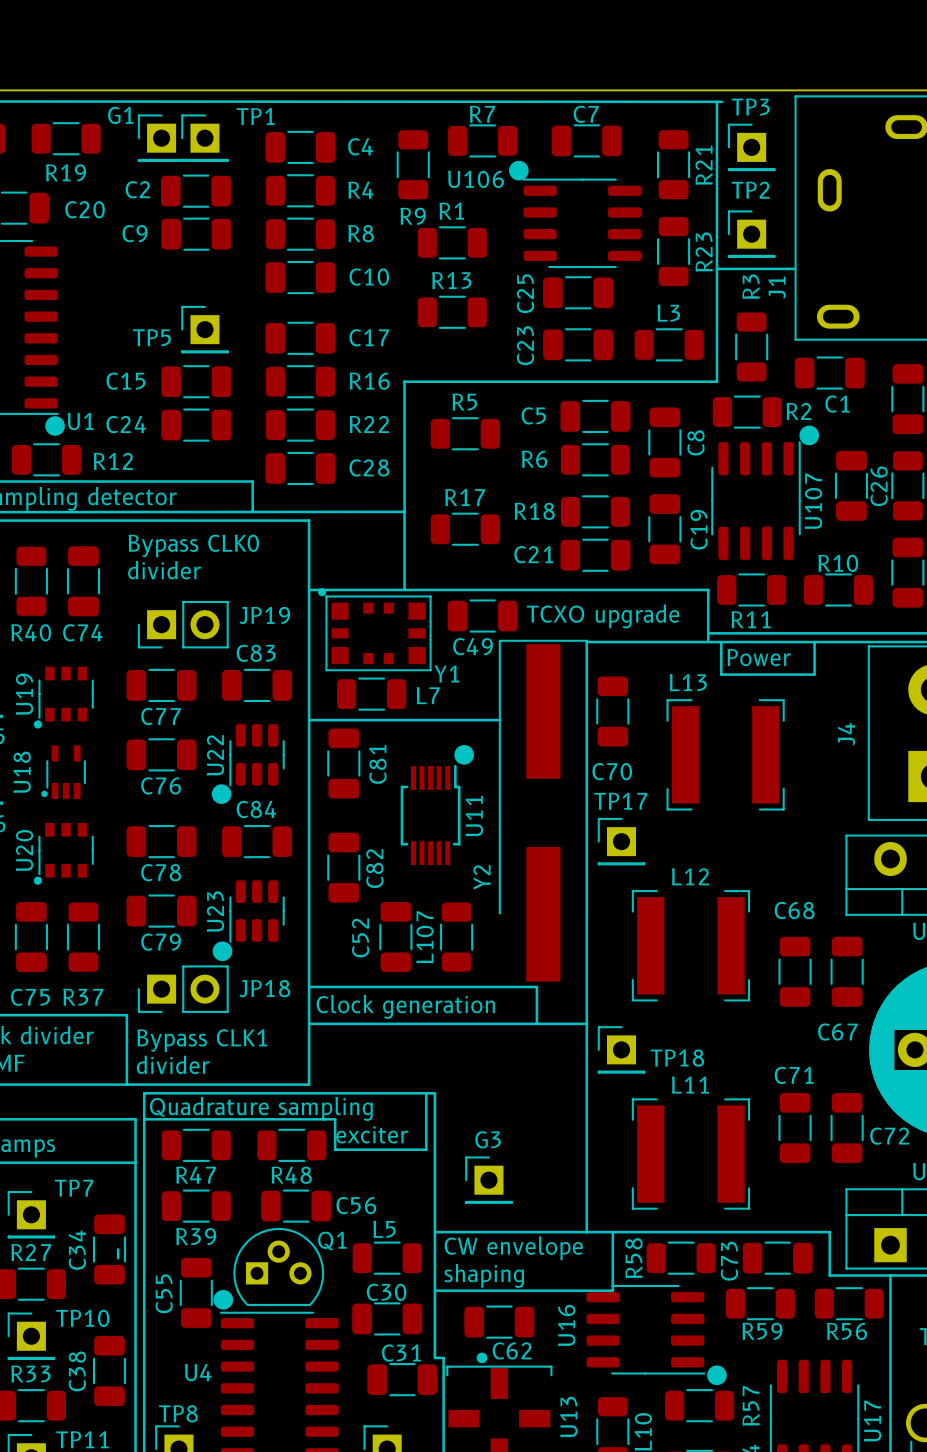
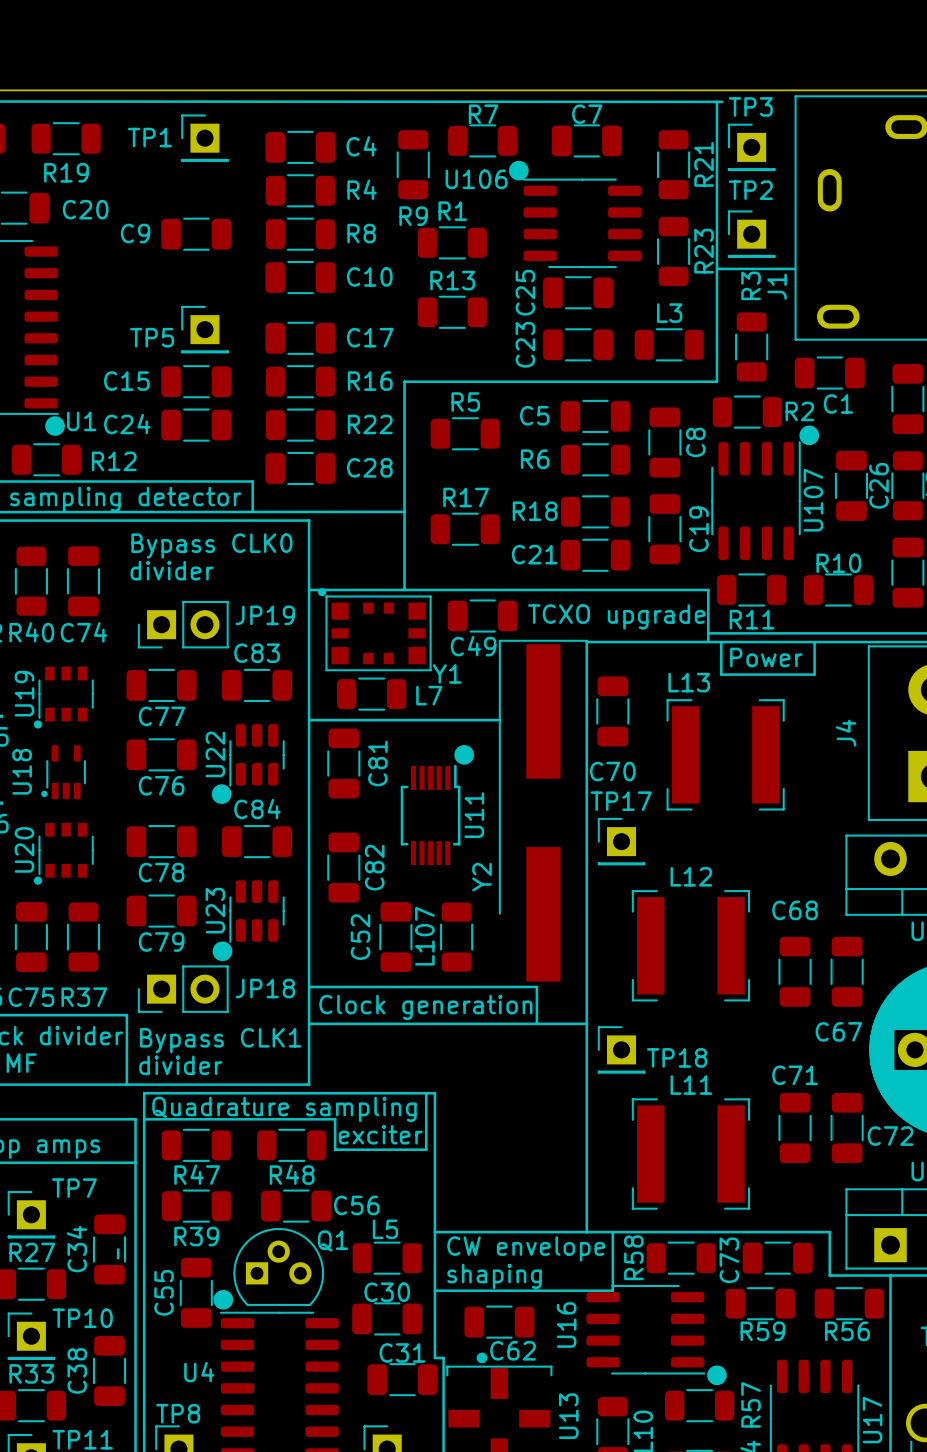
TP1 name position: TP1 (255, 116) -> TP1 (149, 137)
G1: (161, 138) -> none
C2: (195, 191) -> none
G3: (488, 1180) -> none

